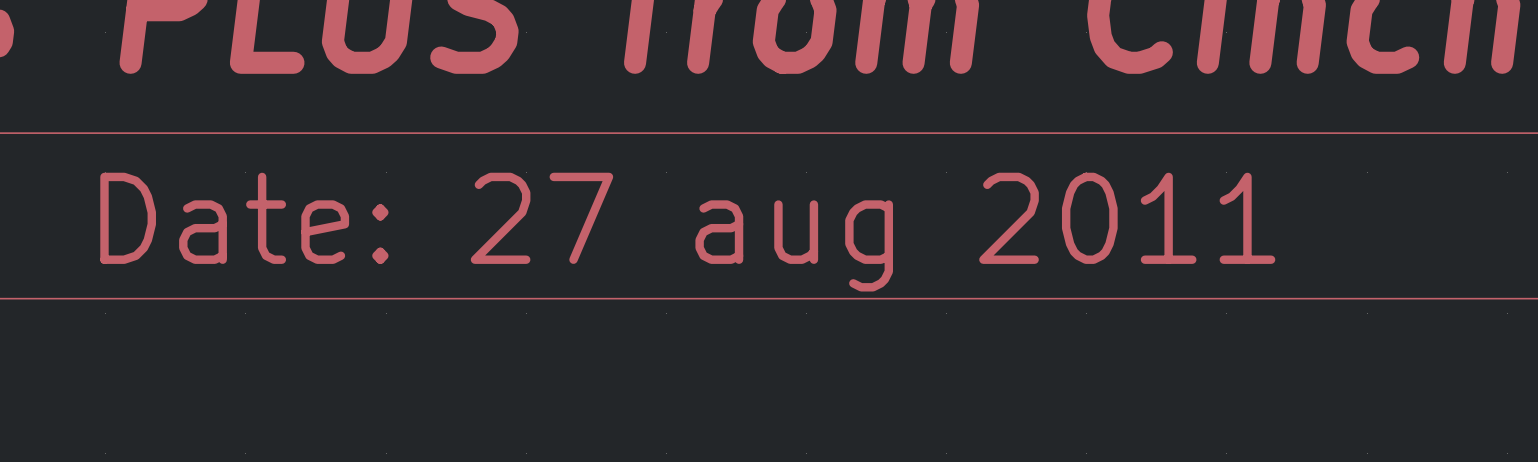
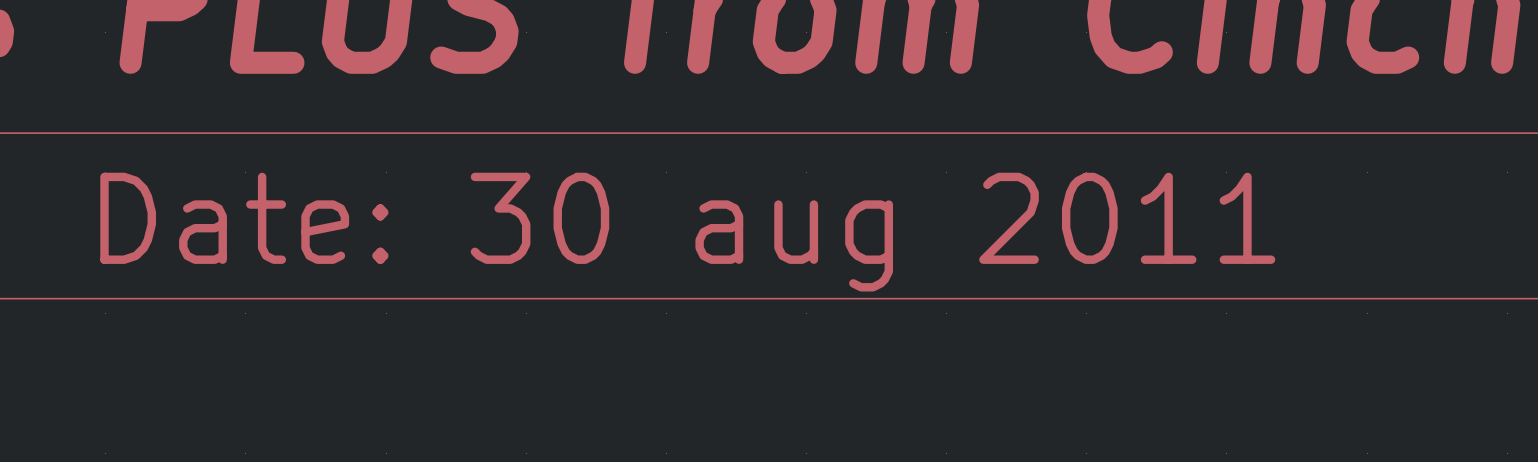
title block: Date: 27 aug 2011 (687, 232) -> Date: 30 aug 2011 (687, 232)

